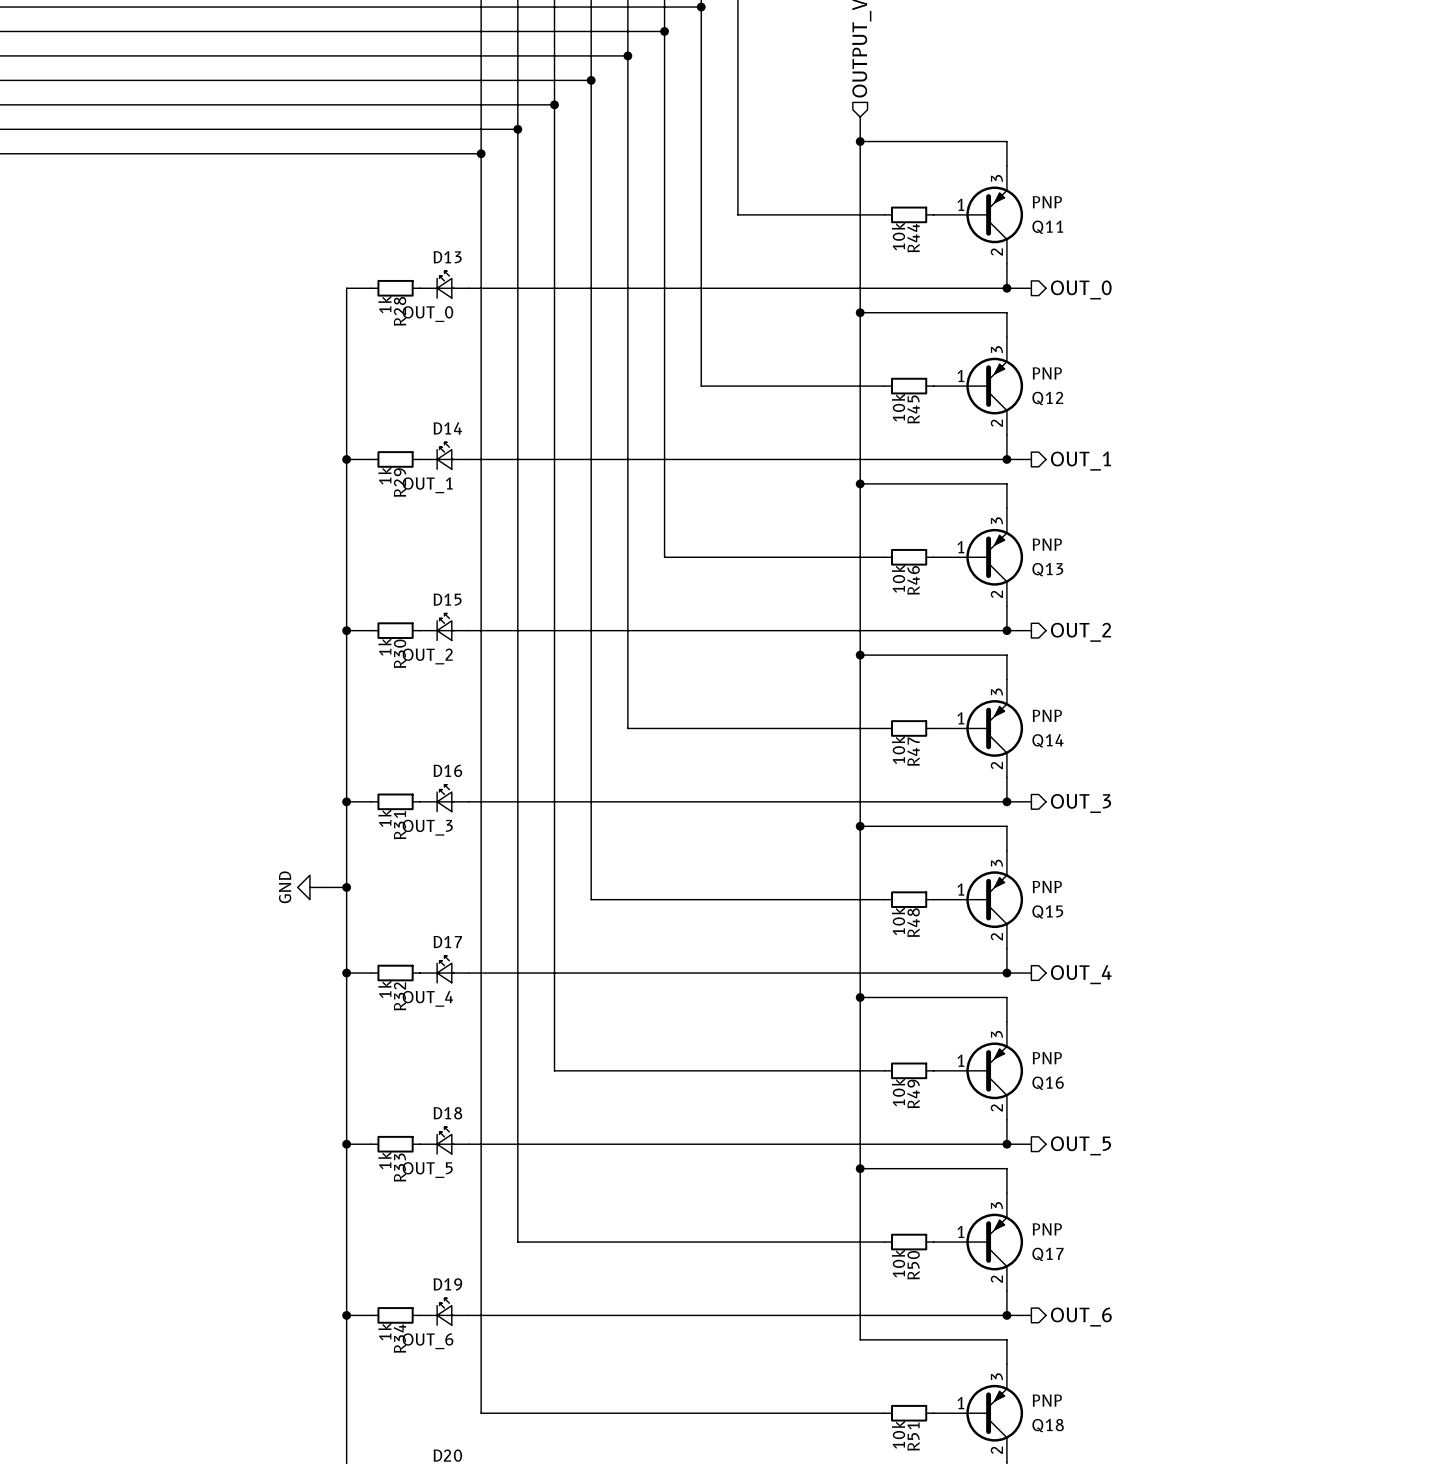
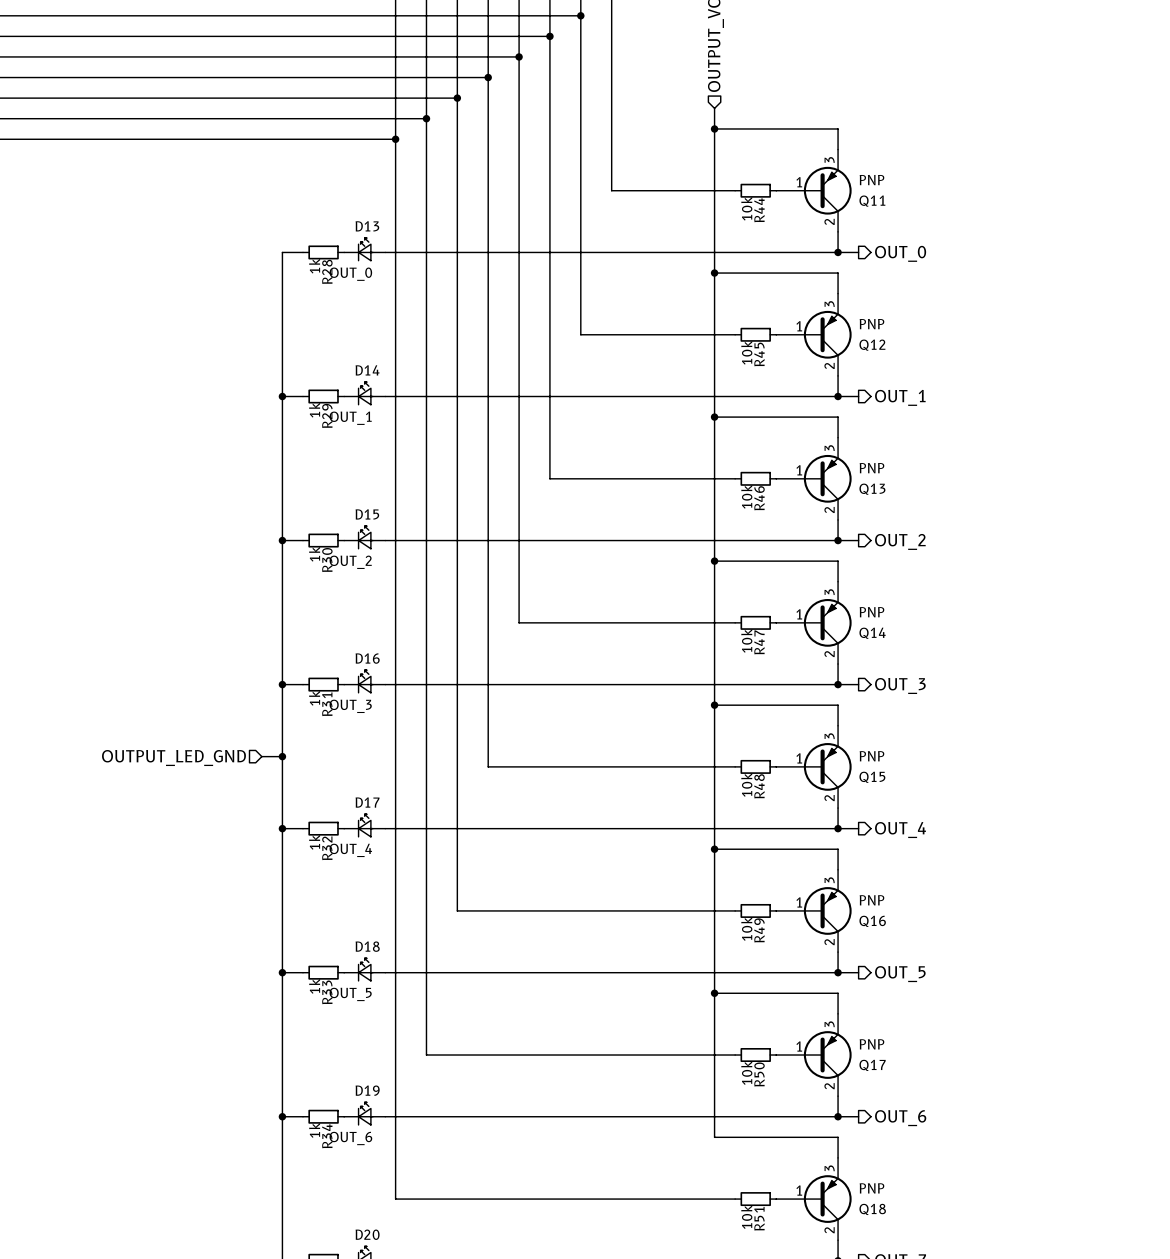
power symbol: GND (309, 887) -> none
hierarchical label: none -> OUTPUT_LED_GND (173, 758)

